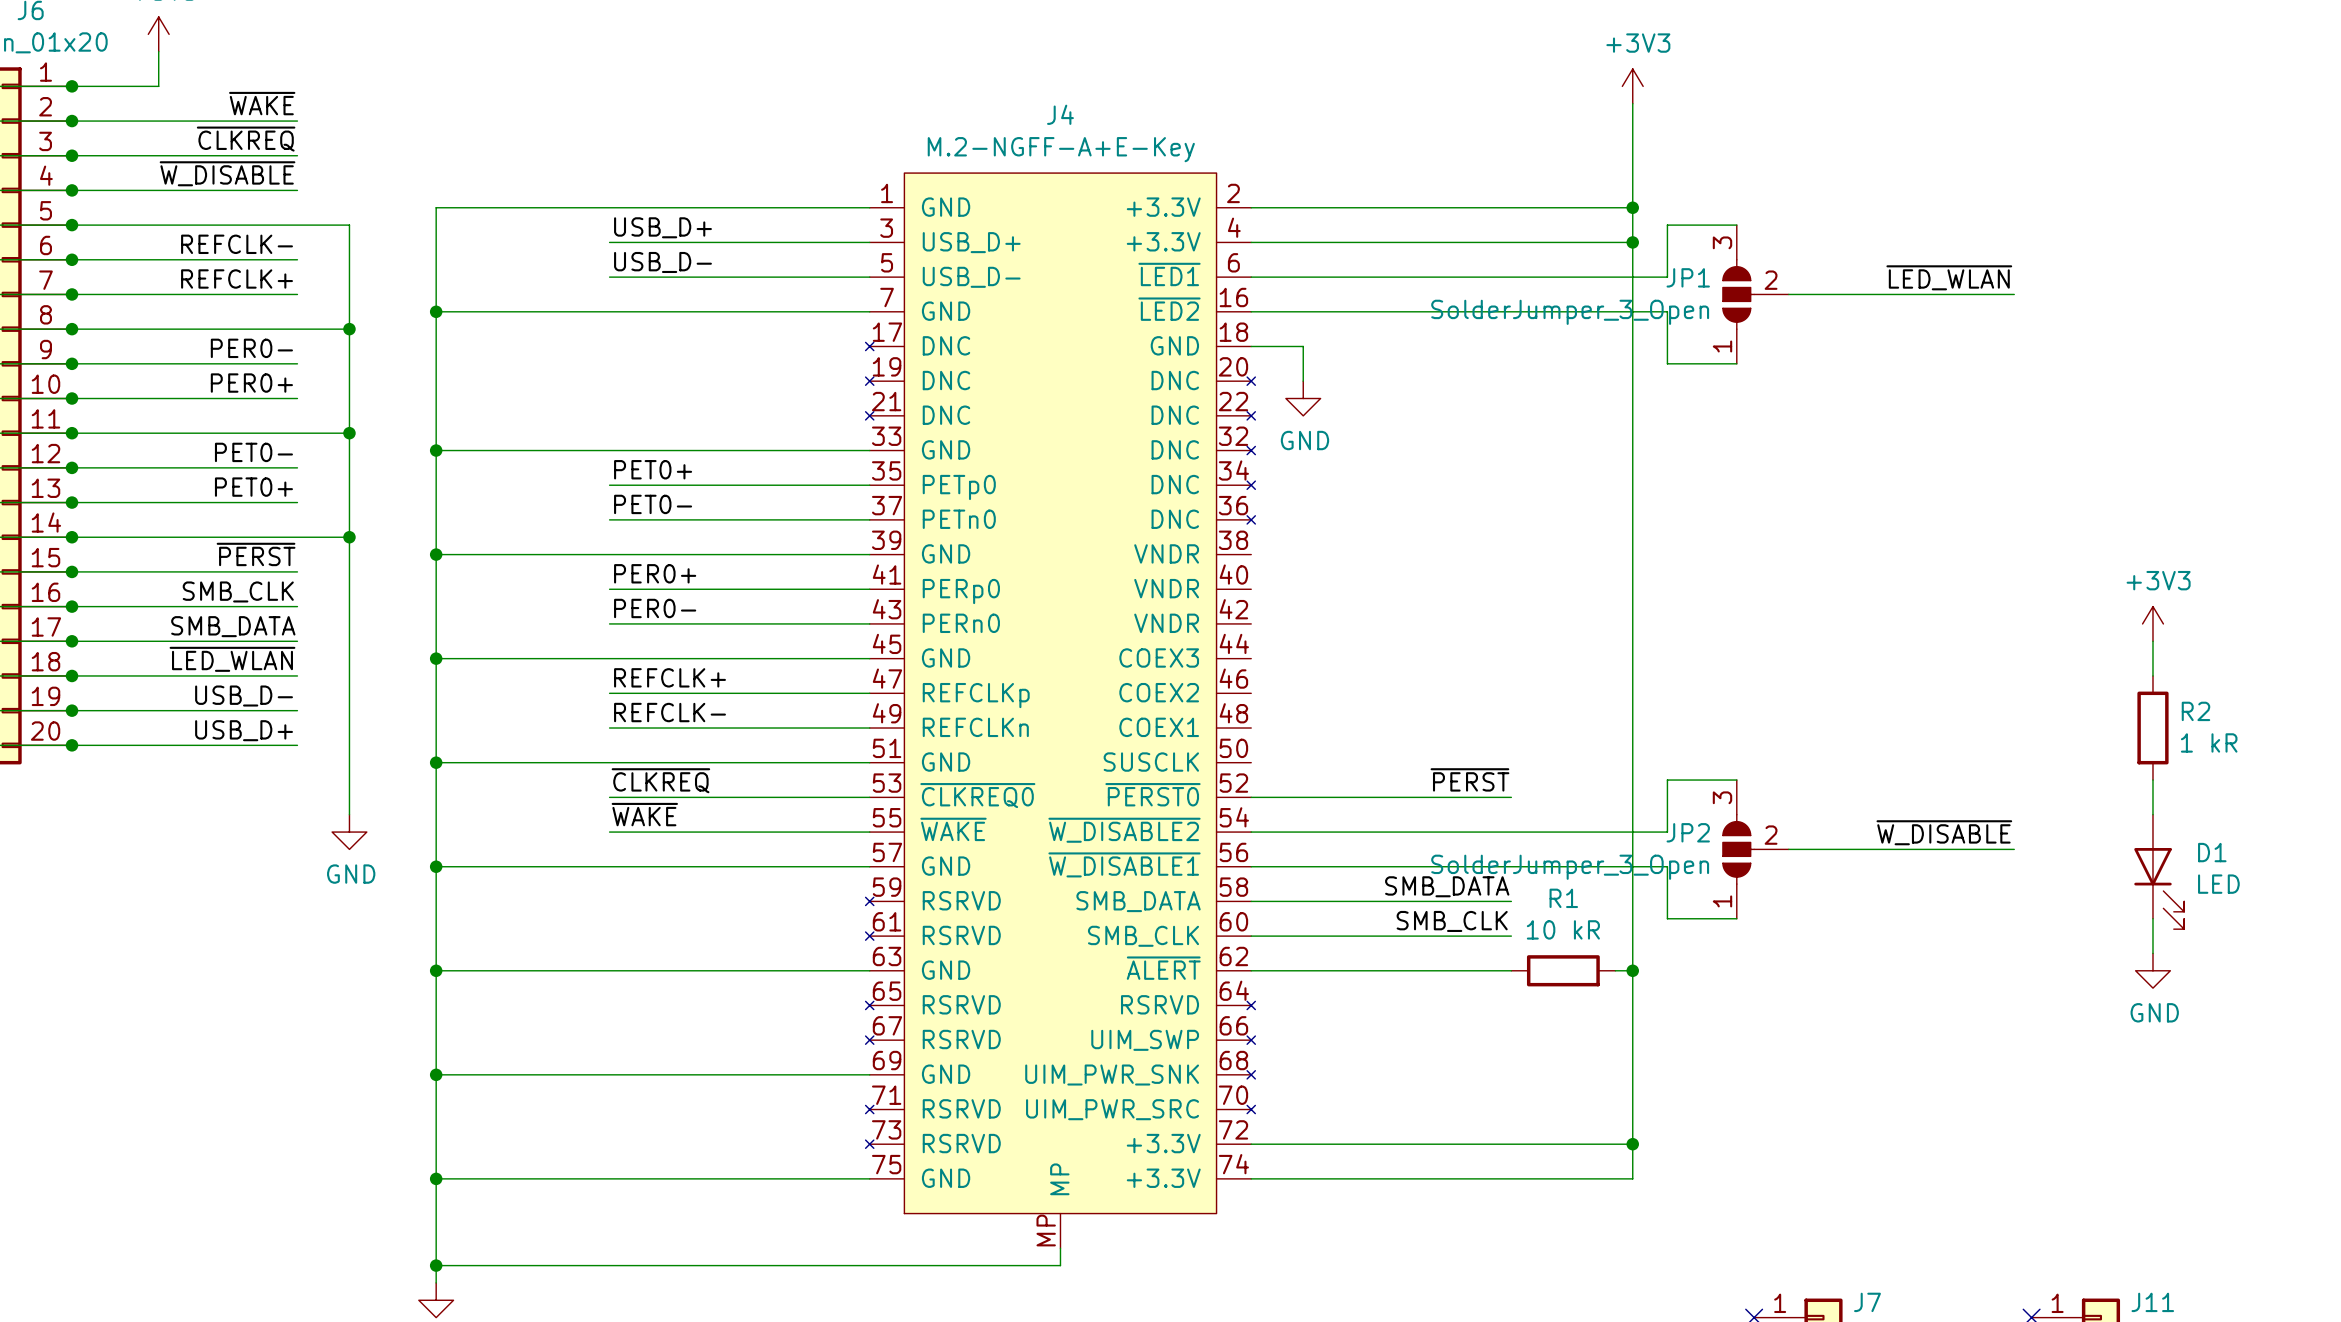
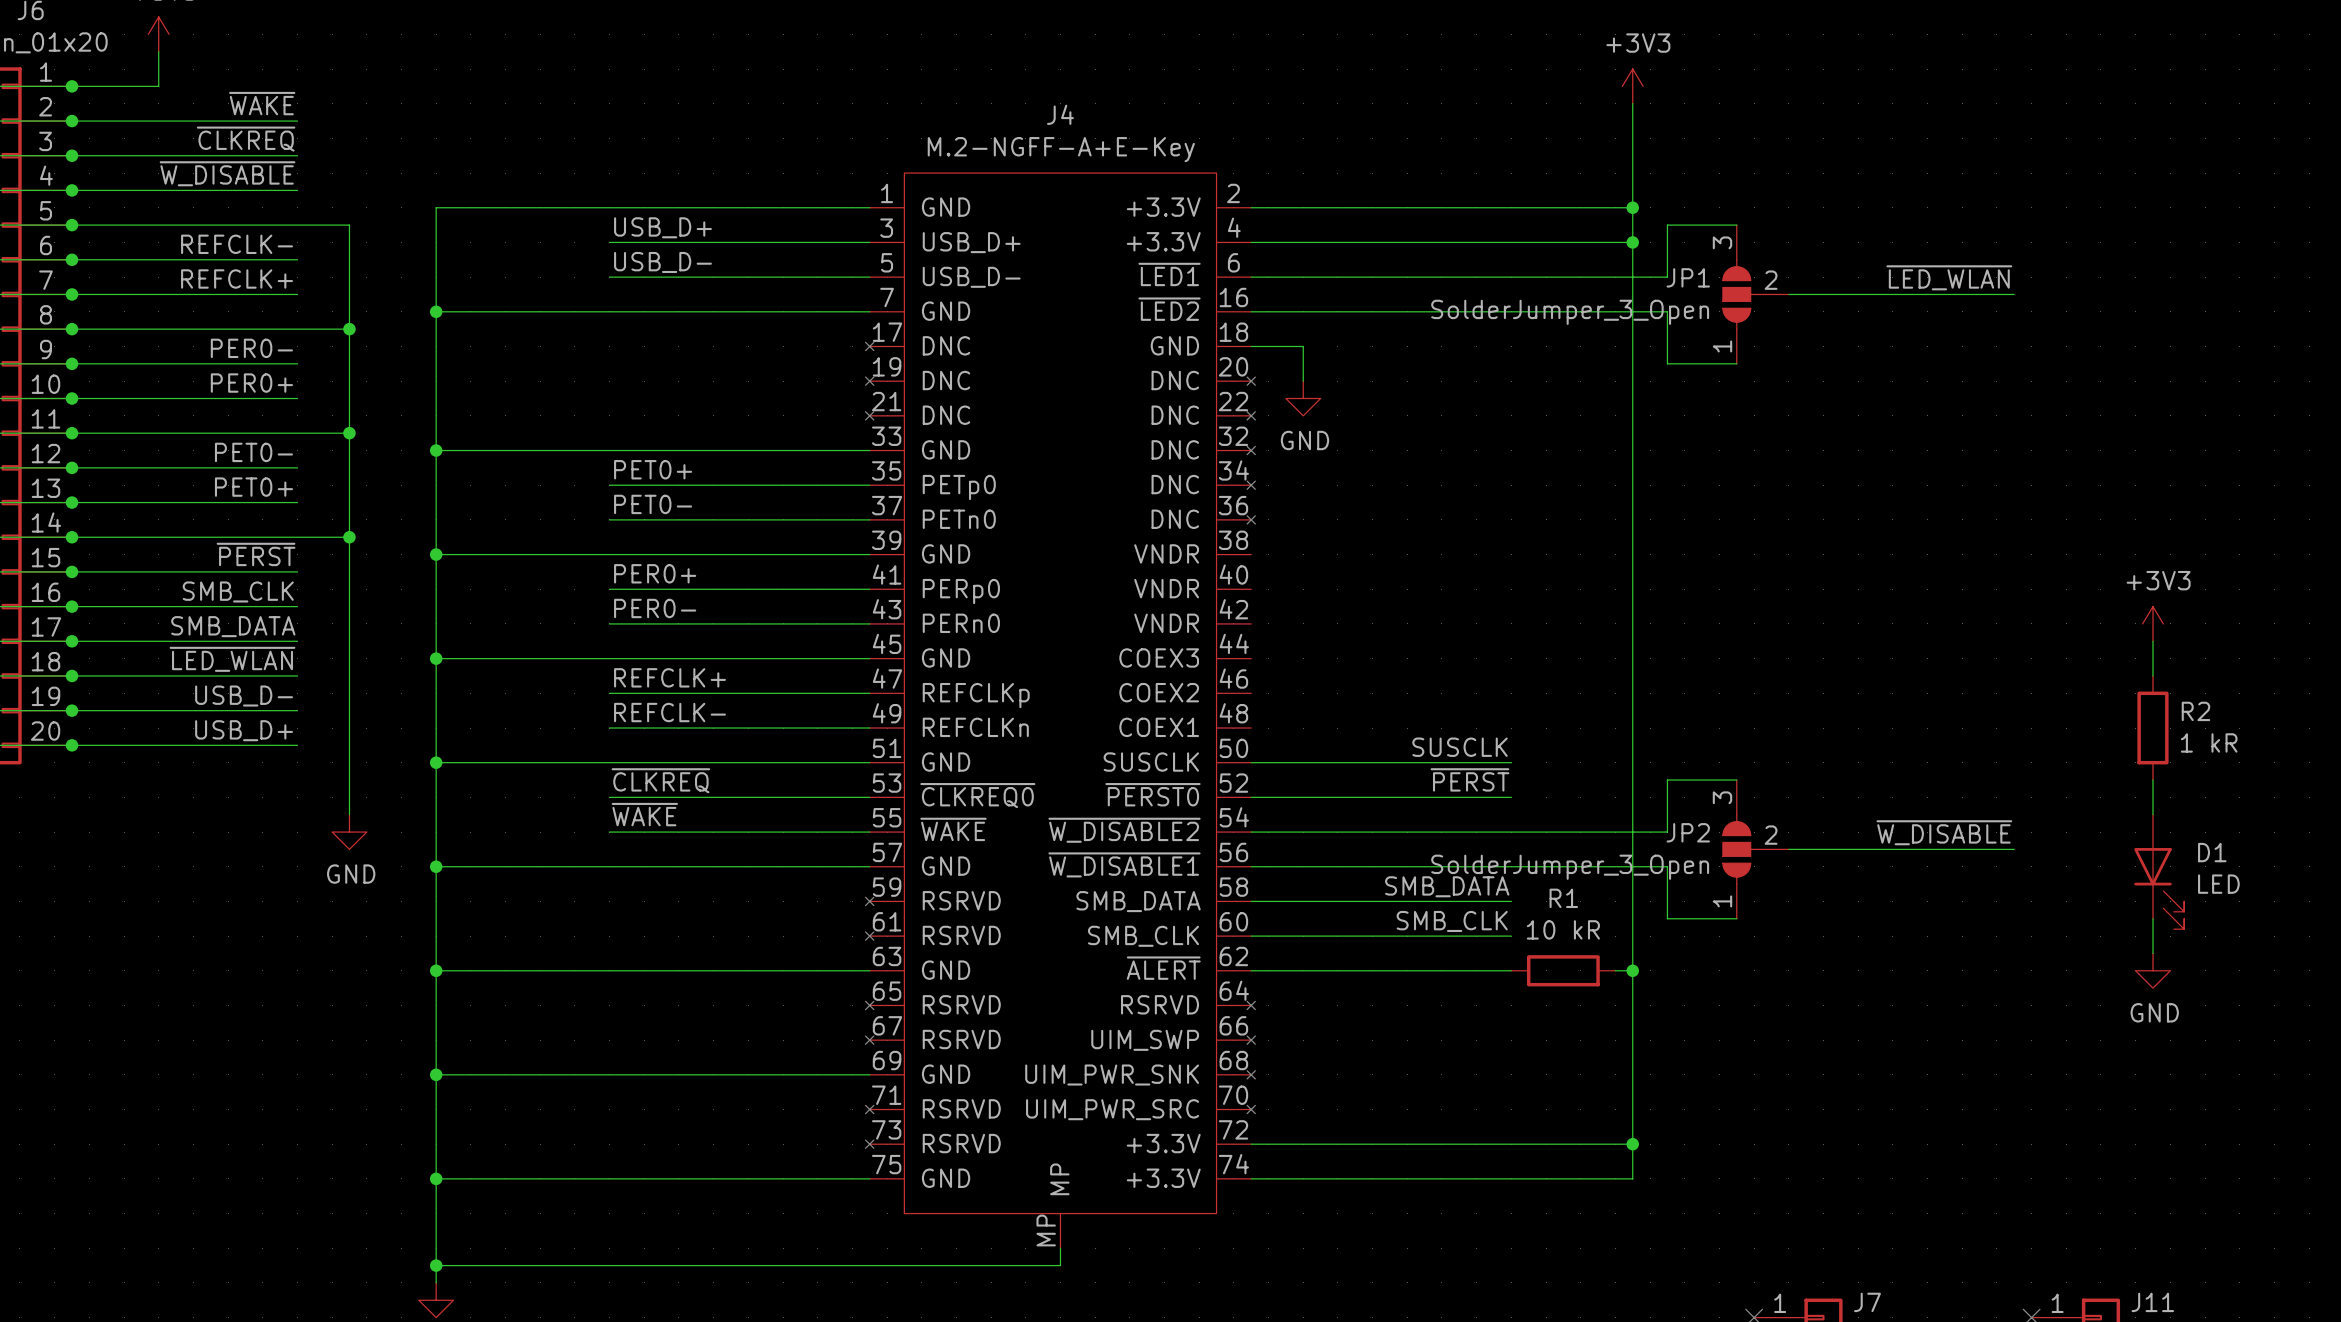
label: none -> SUSCLK (1460, 747)
wire: none -> (1251, 762) (1511, 762)

